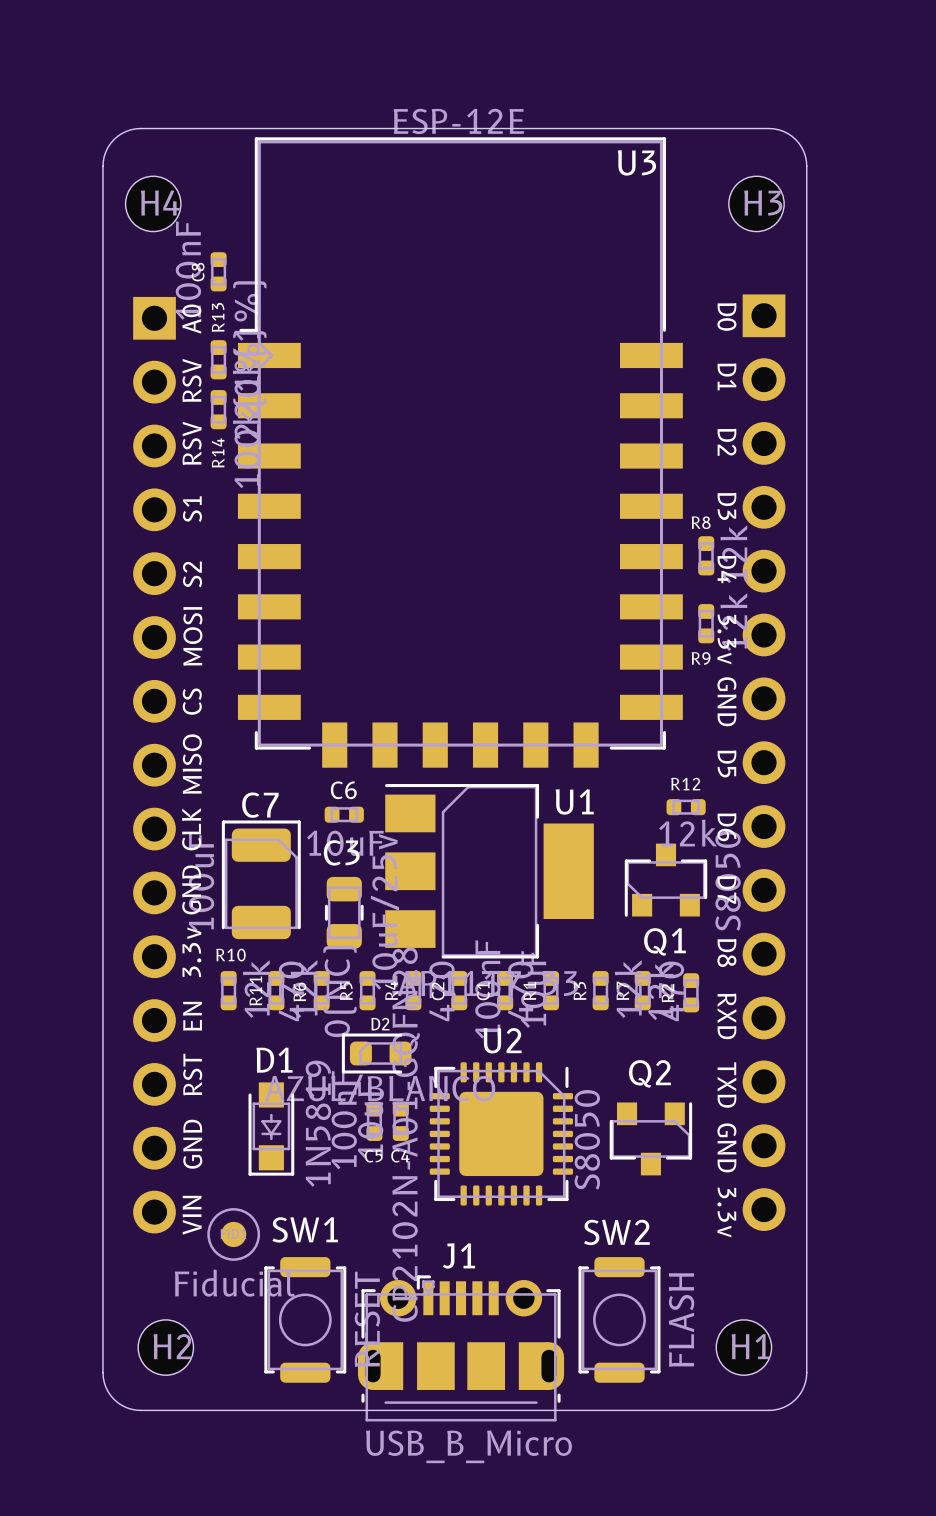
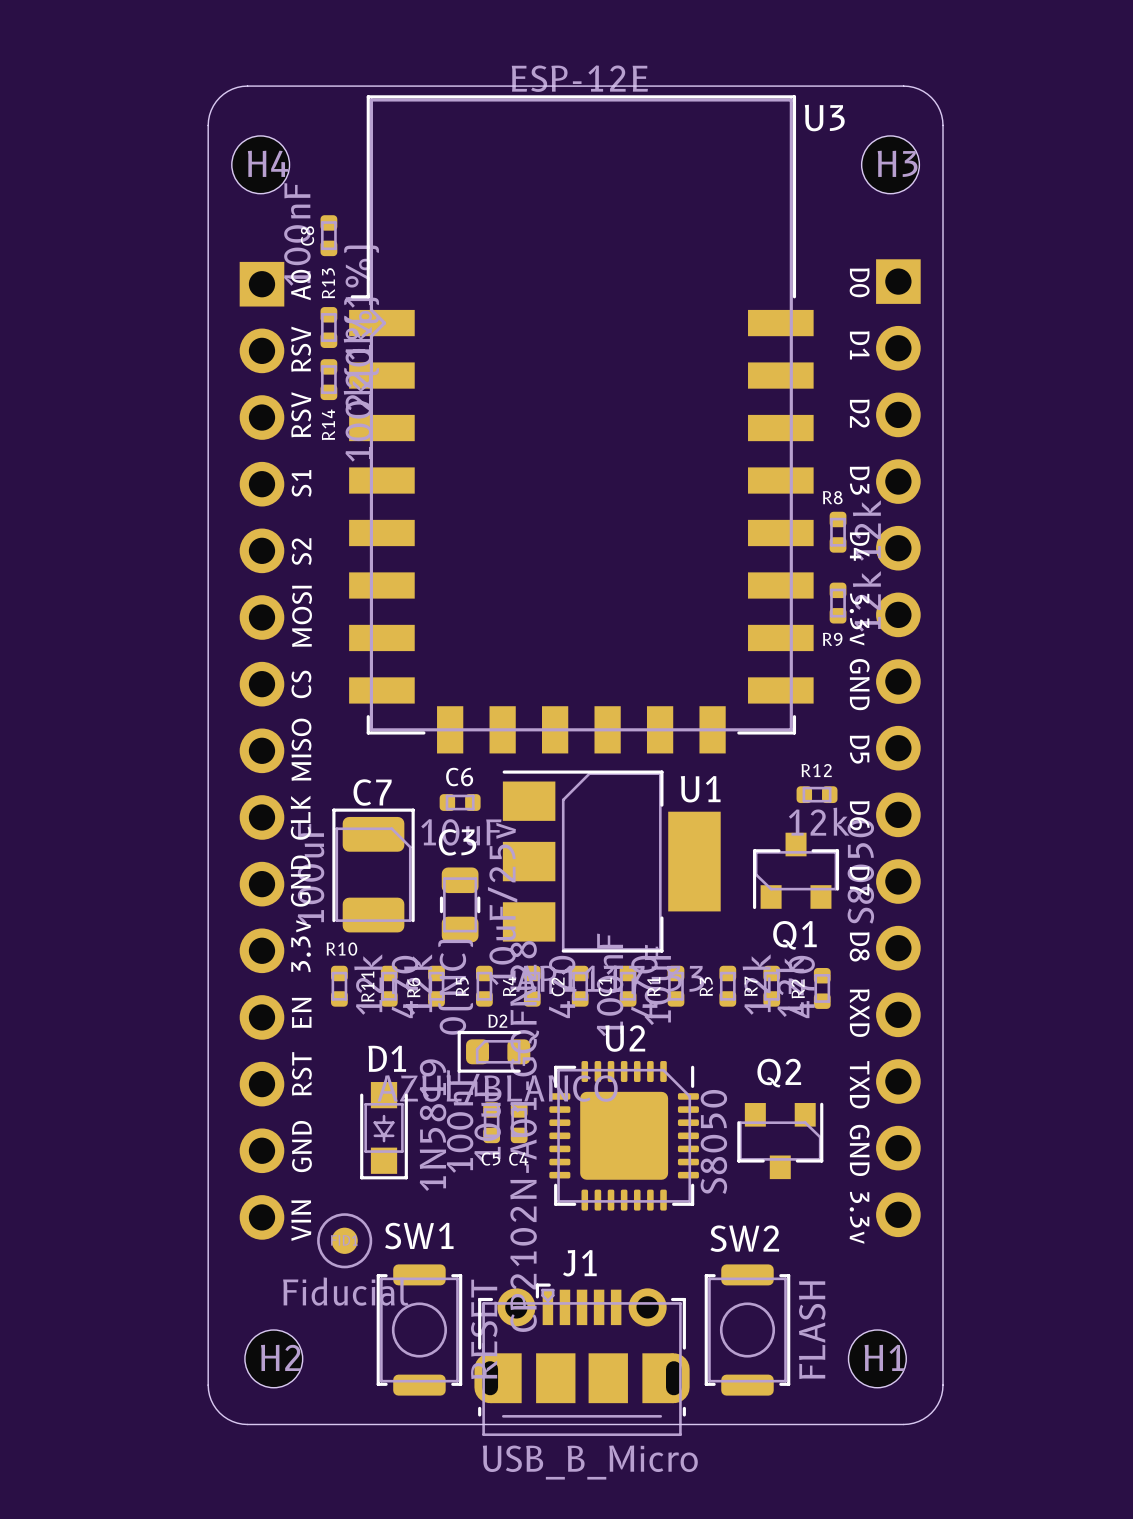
U3 name position: U3 (636, 162) -> U3 (824, 118)

